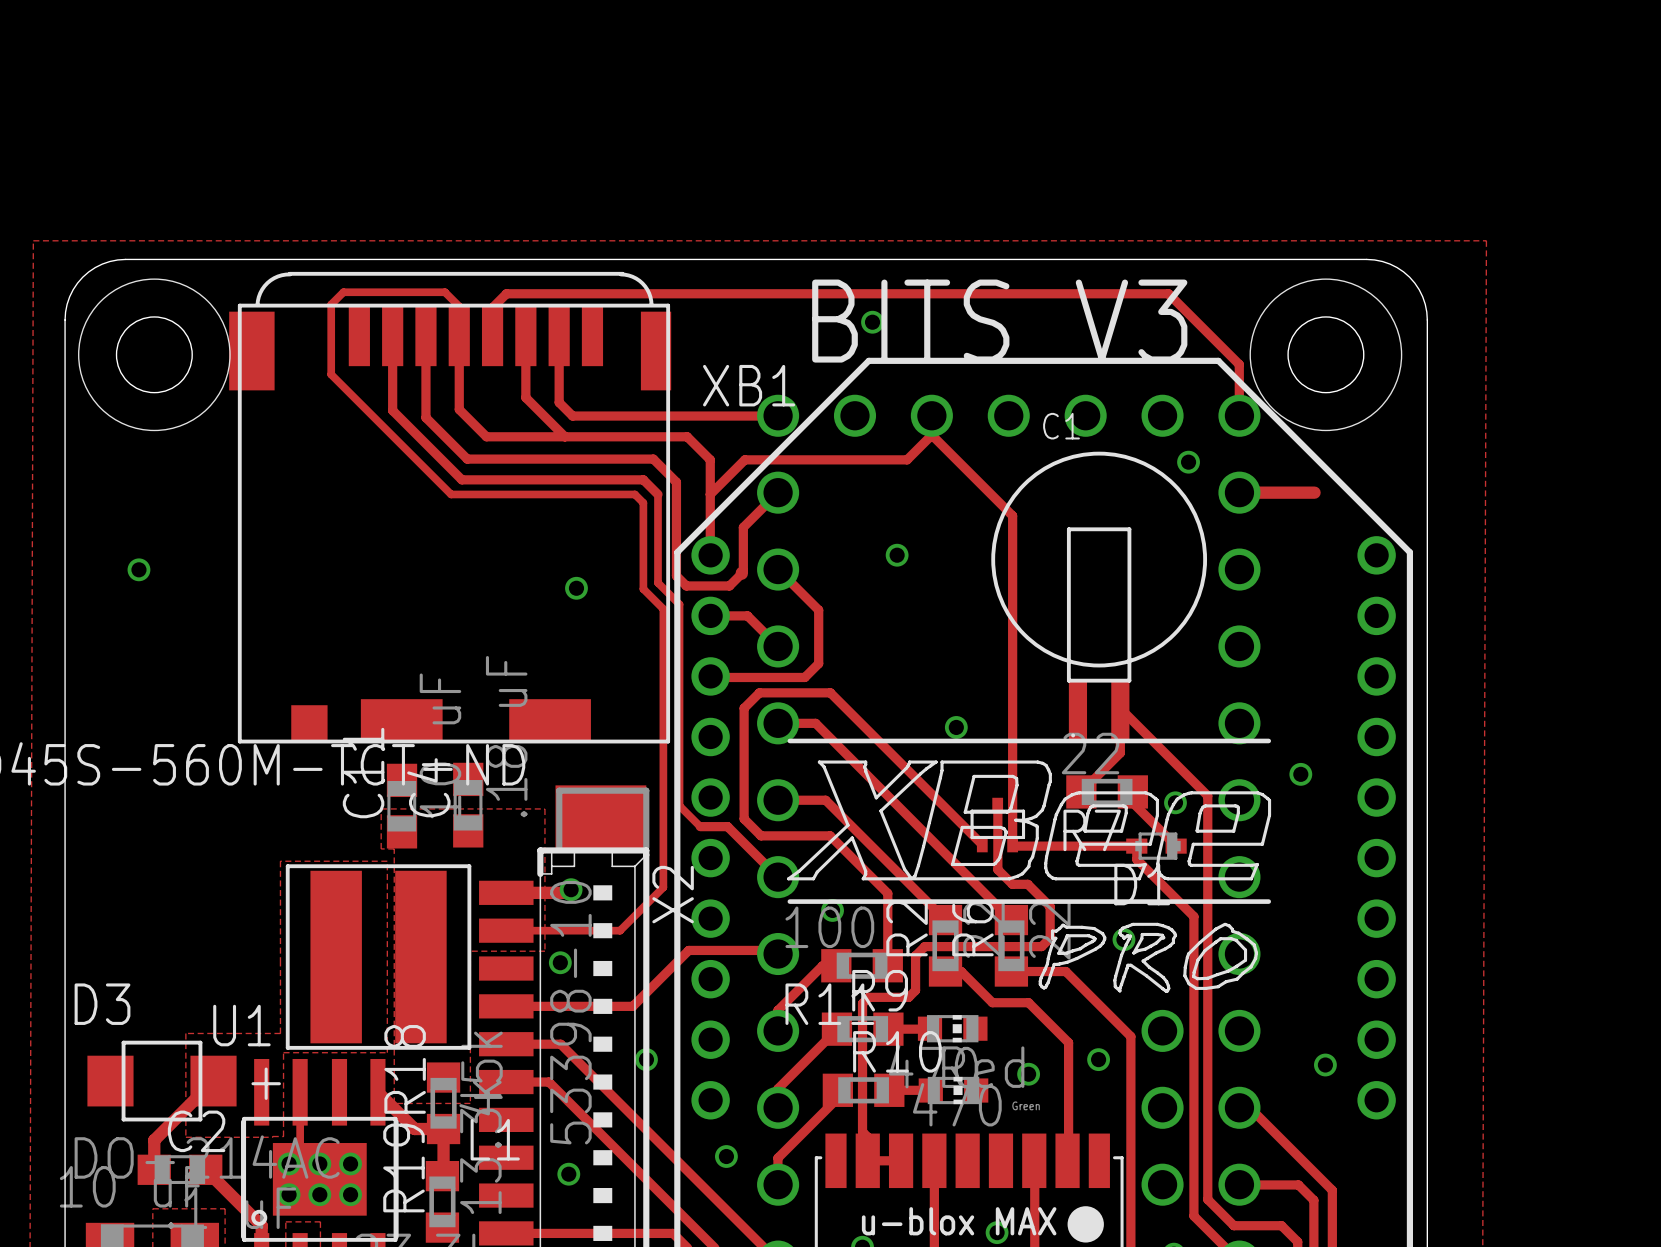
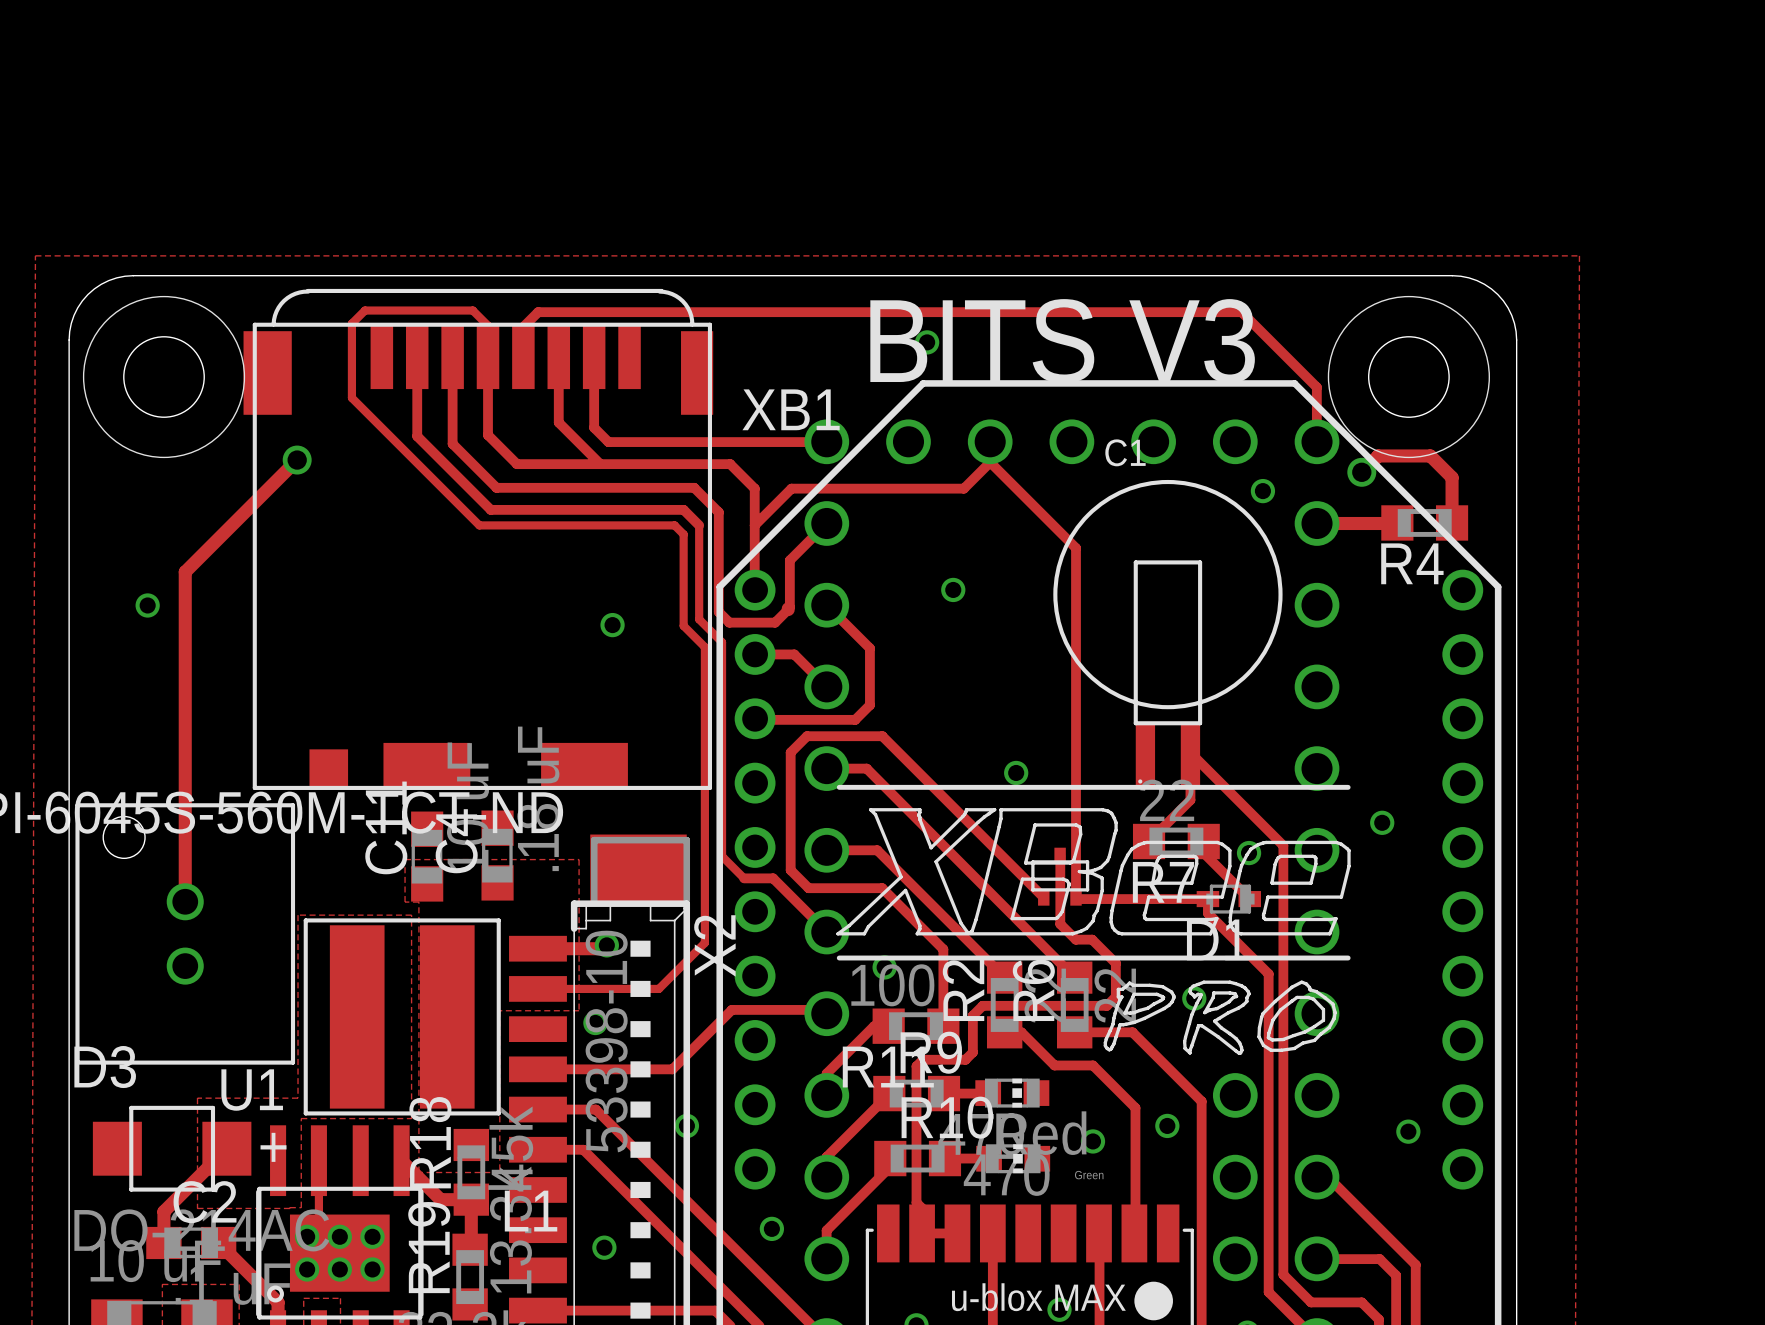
track: none -> (297, 460) (185, 571) (185, 901)
via: none -> (297, 460)
track: none -> (1361, 472) (1378, 455) (1430, 455) (1452, 477) (1452, 522)
via: none -> (1361, 472)
R4: none -> (1424, 522)
part: none -> (185, 933)

